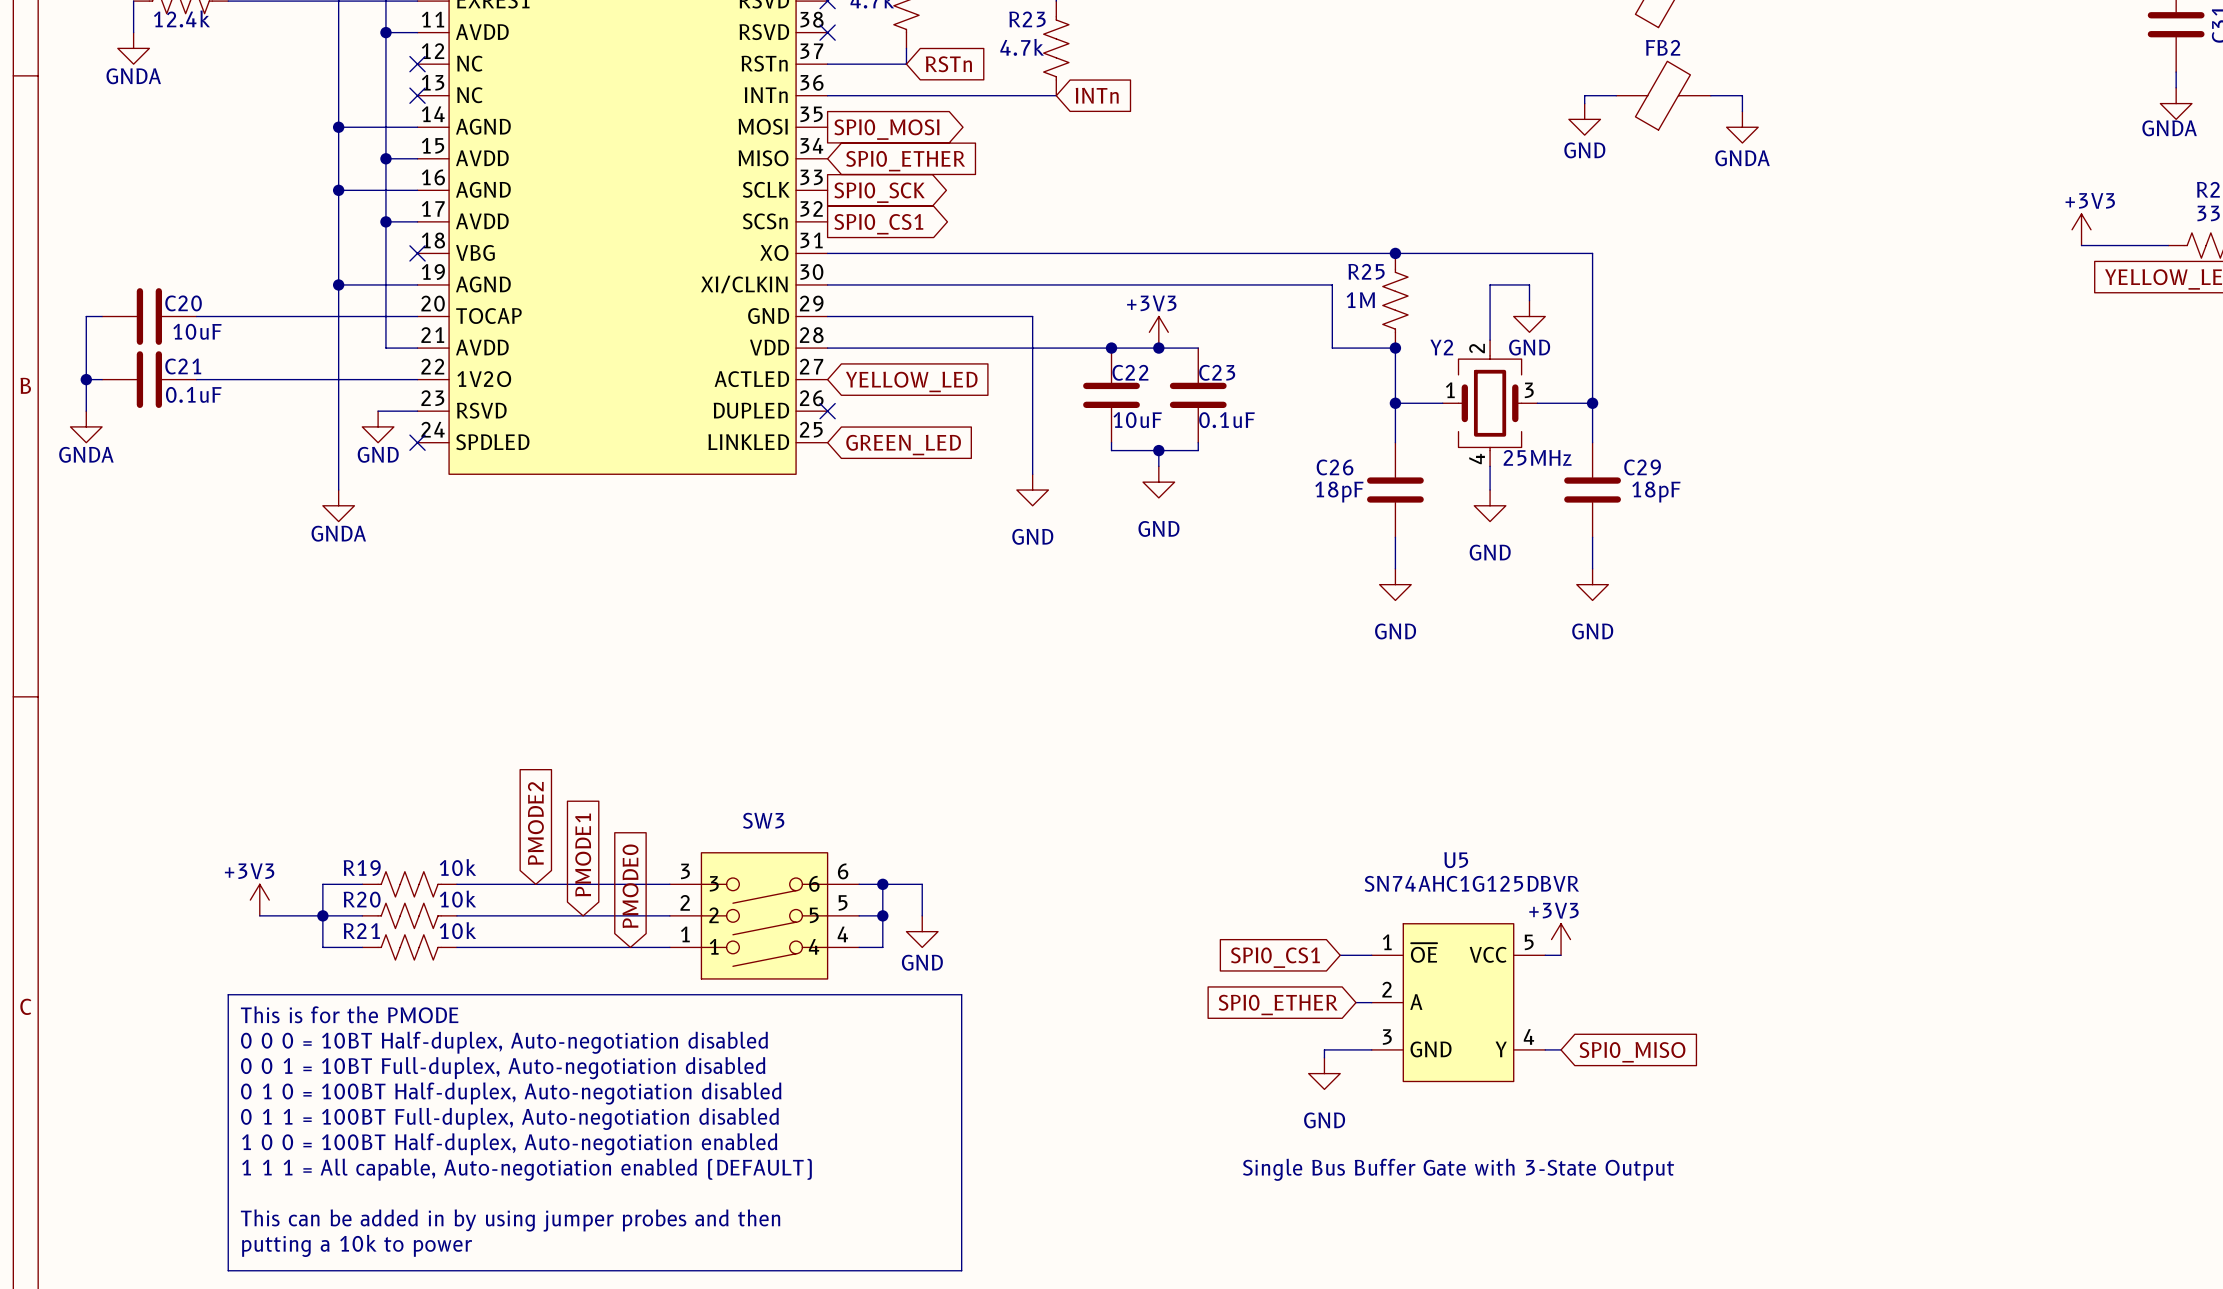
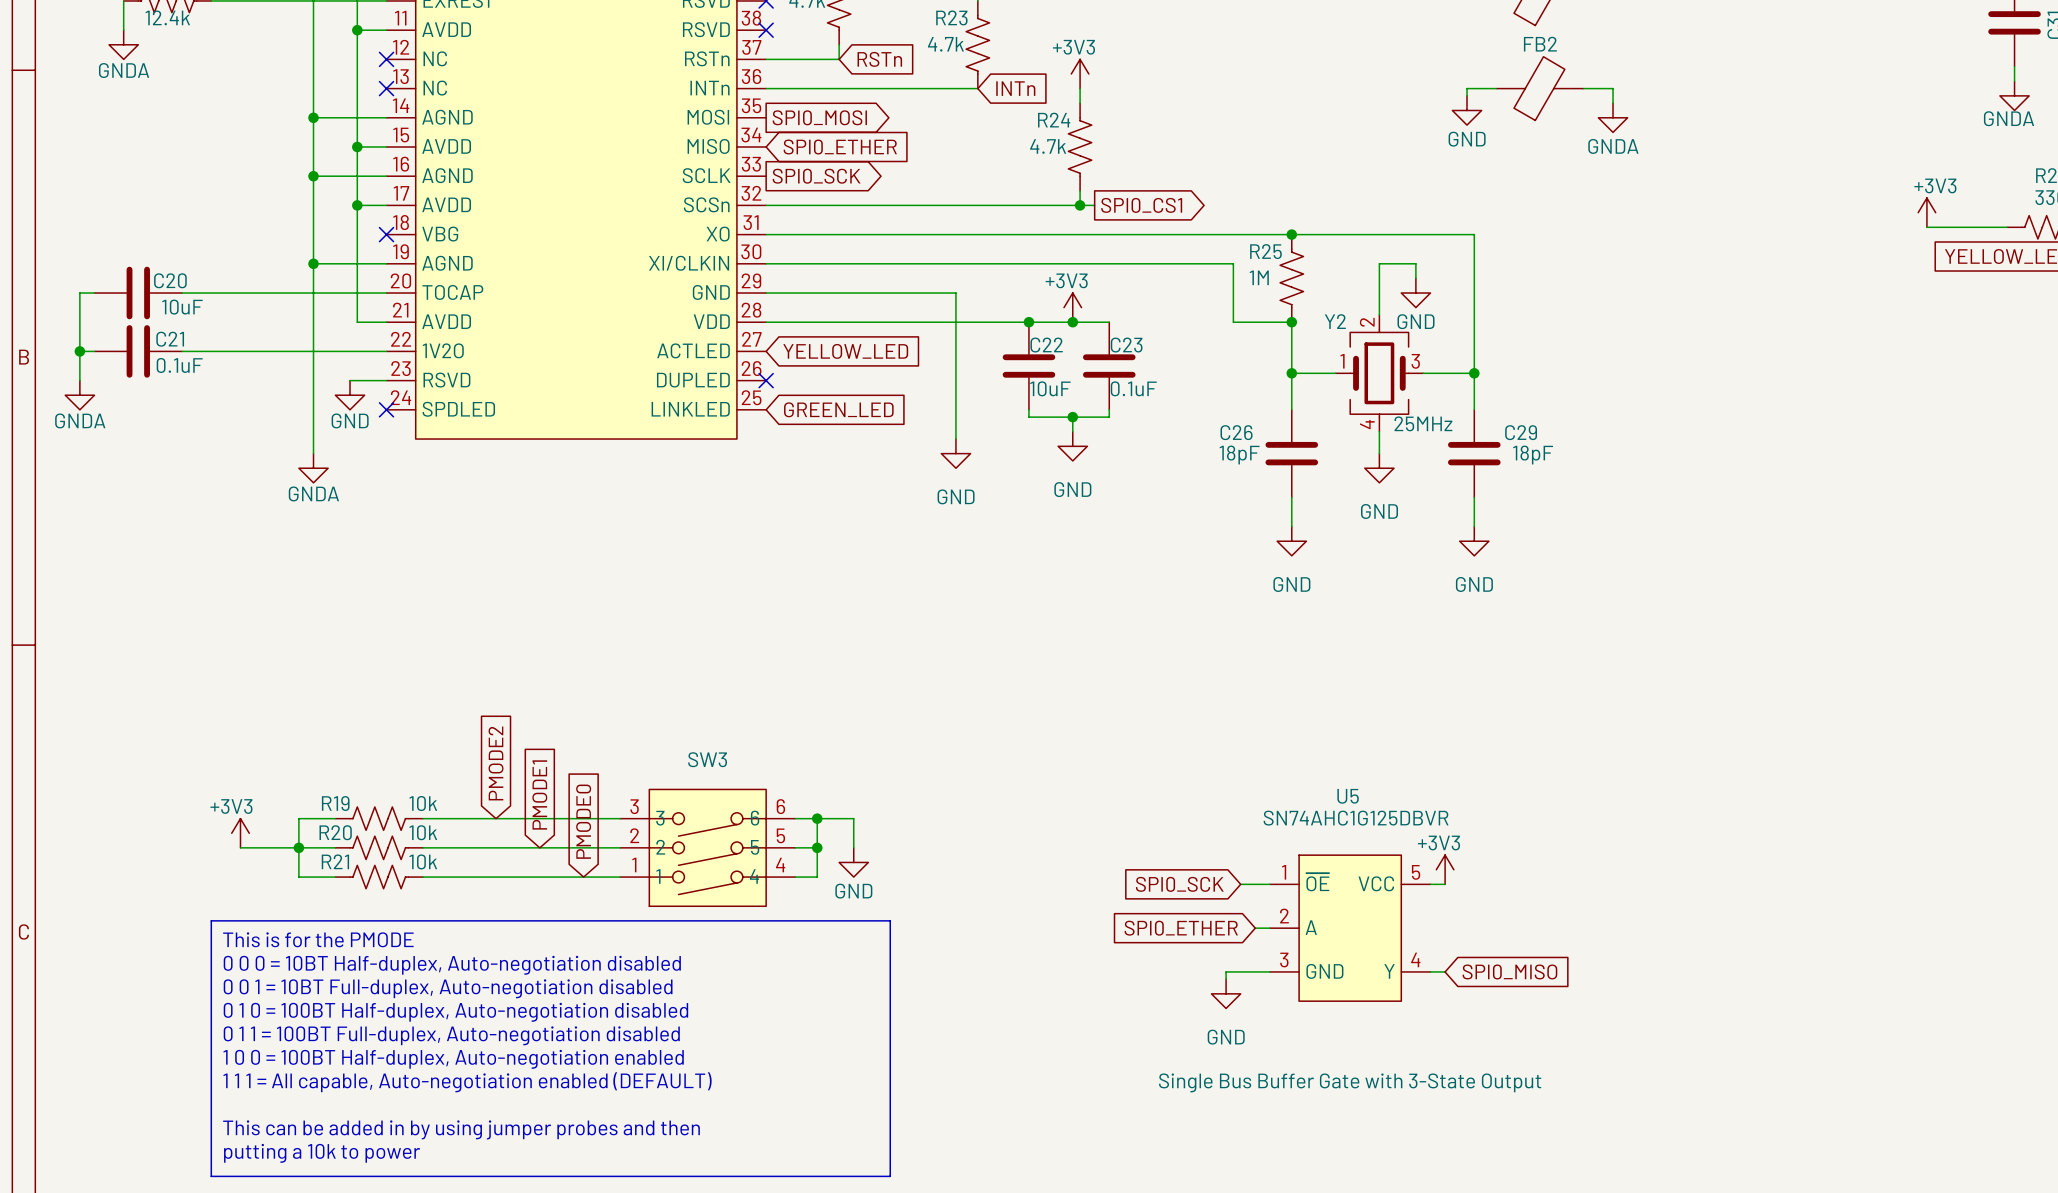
power symbol: none -> +3V3 (1080, 73)
wire: none -> (1080, 88) (1080, 103)
R24: none -> 4.7k (1080, 147)
wire: none -> (1080, 190) (1080, 205)
wire: none -> (766, 205) (1094, 205)
junction: none -> (1080, 205)
global label: SPI0_CS1 (878, 224) -> none
global label: none -> SPI0_CS1 (1141, 205)
global label: SPI0_CS1 (1275, 957) -> SPI0_SCK (1179, 884)

